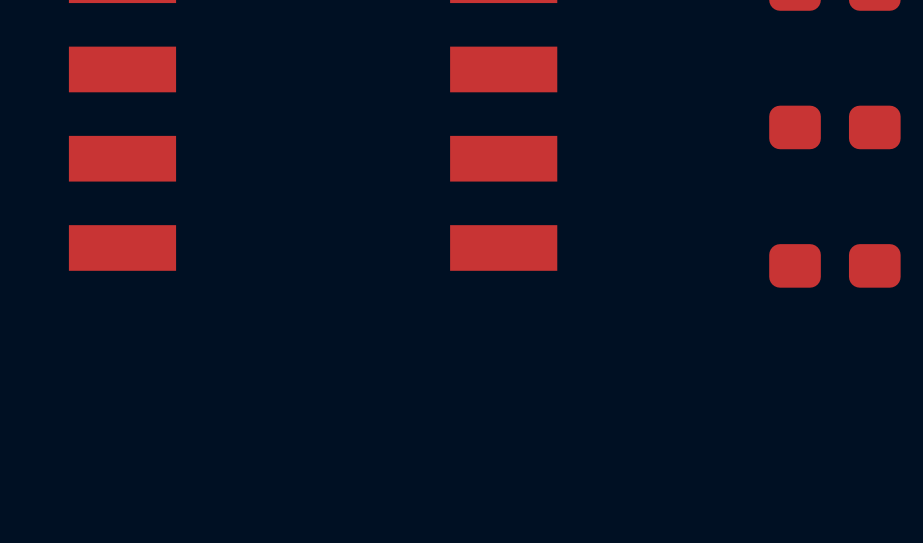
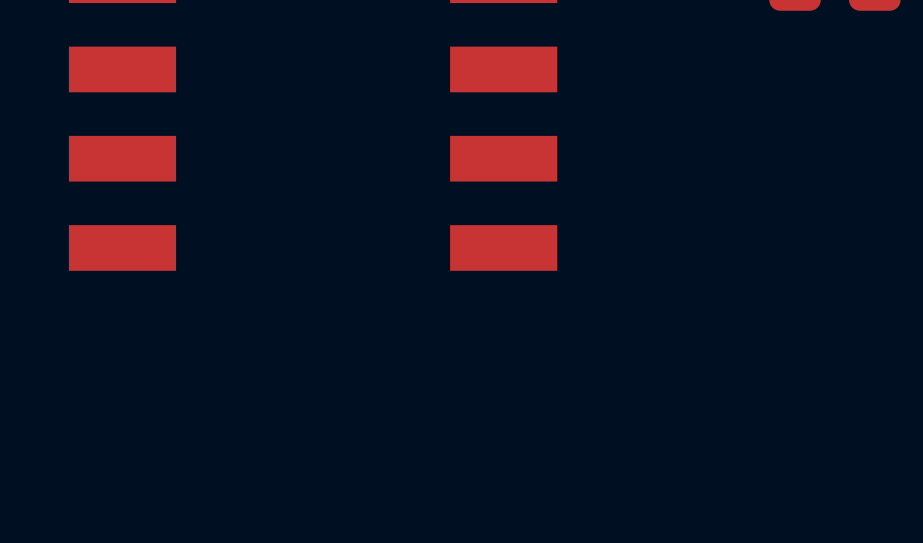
part: (834, 127) -> none
part: (834, 265) -> none

